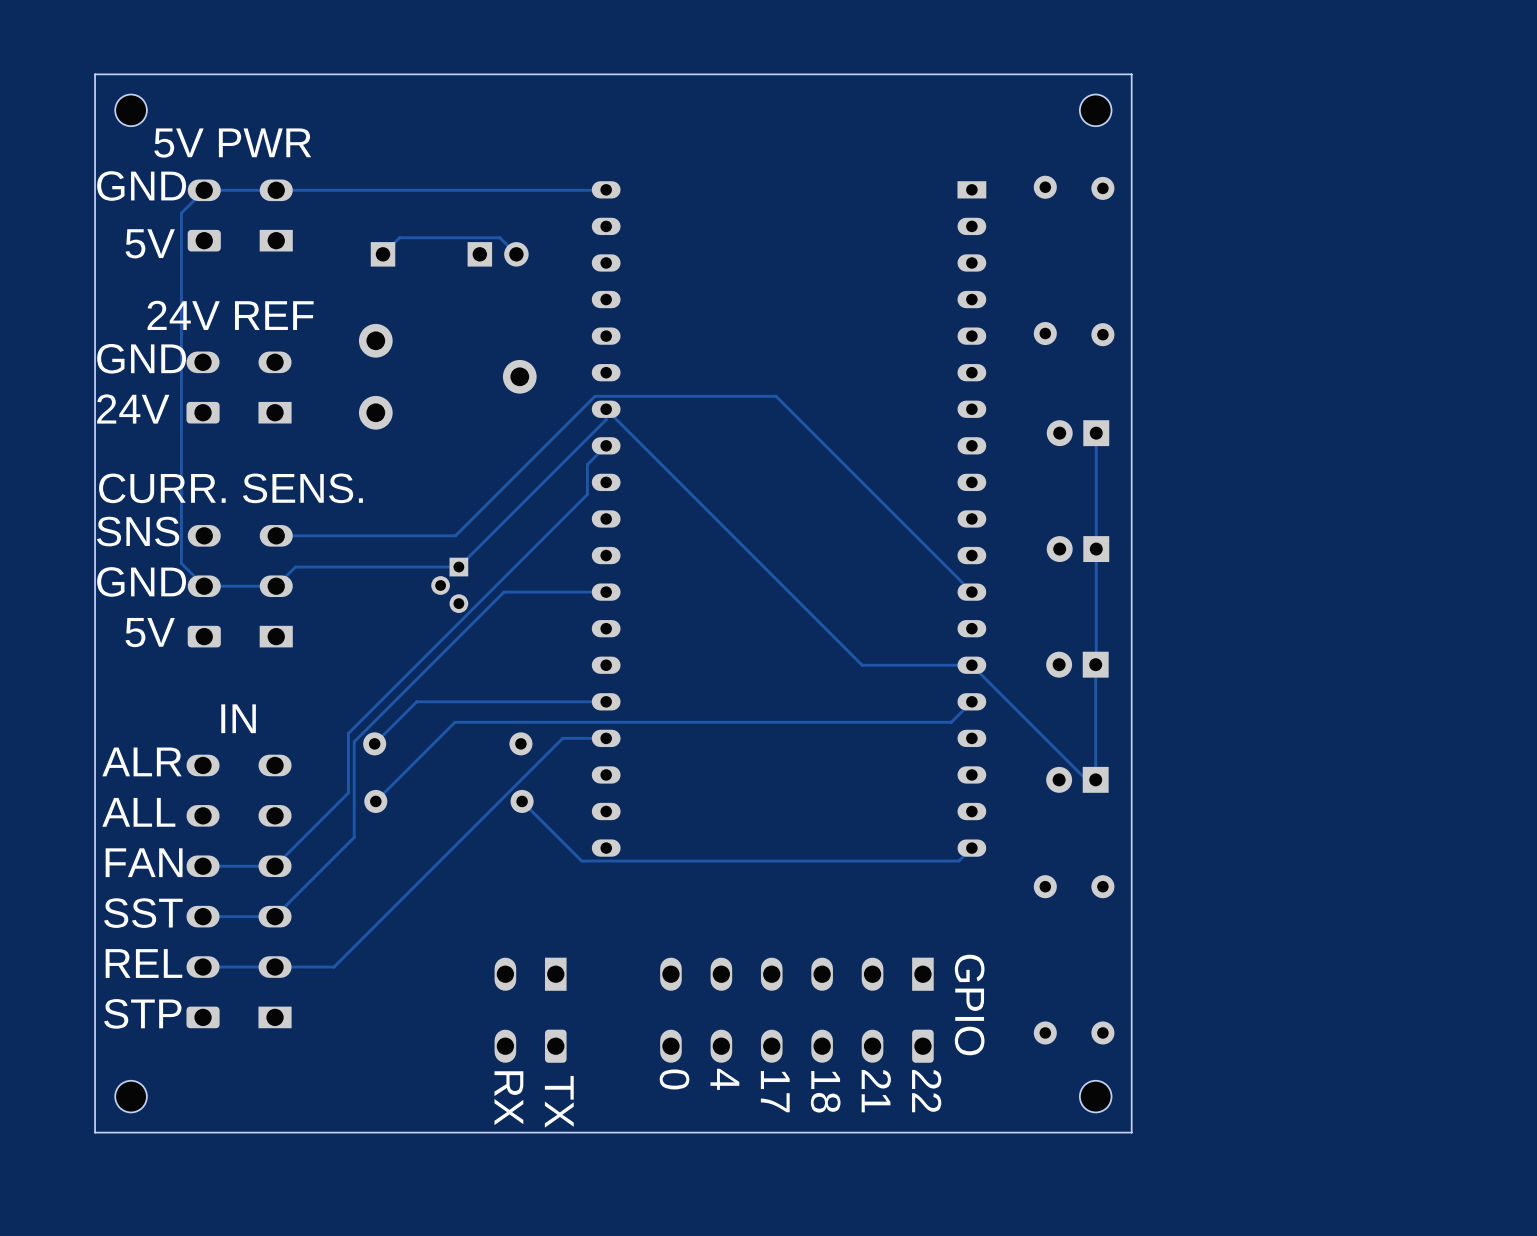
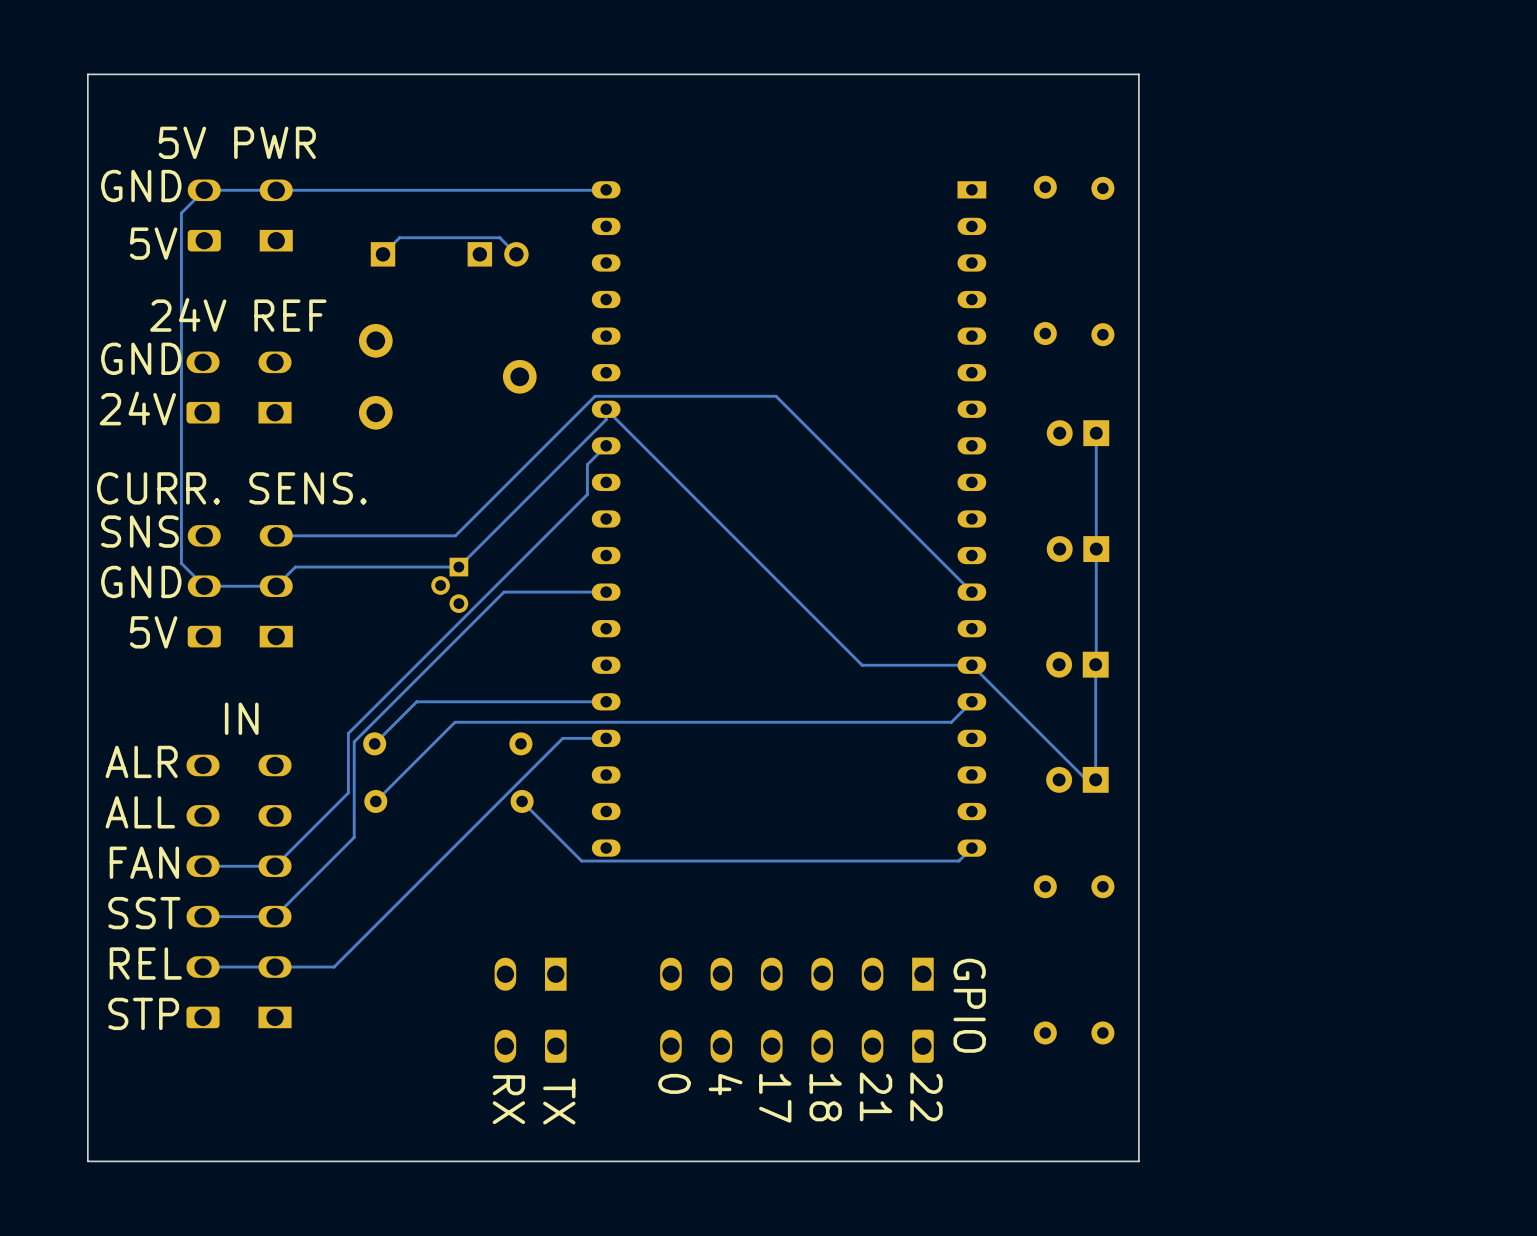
board edge: (1131, 74) (1131, 1132) (95, 1132) (95, 74) -> (1131, 74) (1138, 74) (1138, 1161) (87, 1161) (87, 74) (95, 74)
part: (131, 110) -> none
part: (1095, 110) -> none
part: (131, 1096) -> none
part: (1095, 1096) -> none

